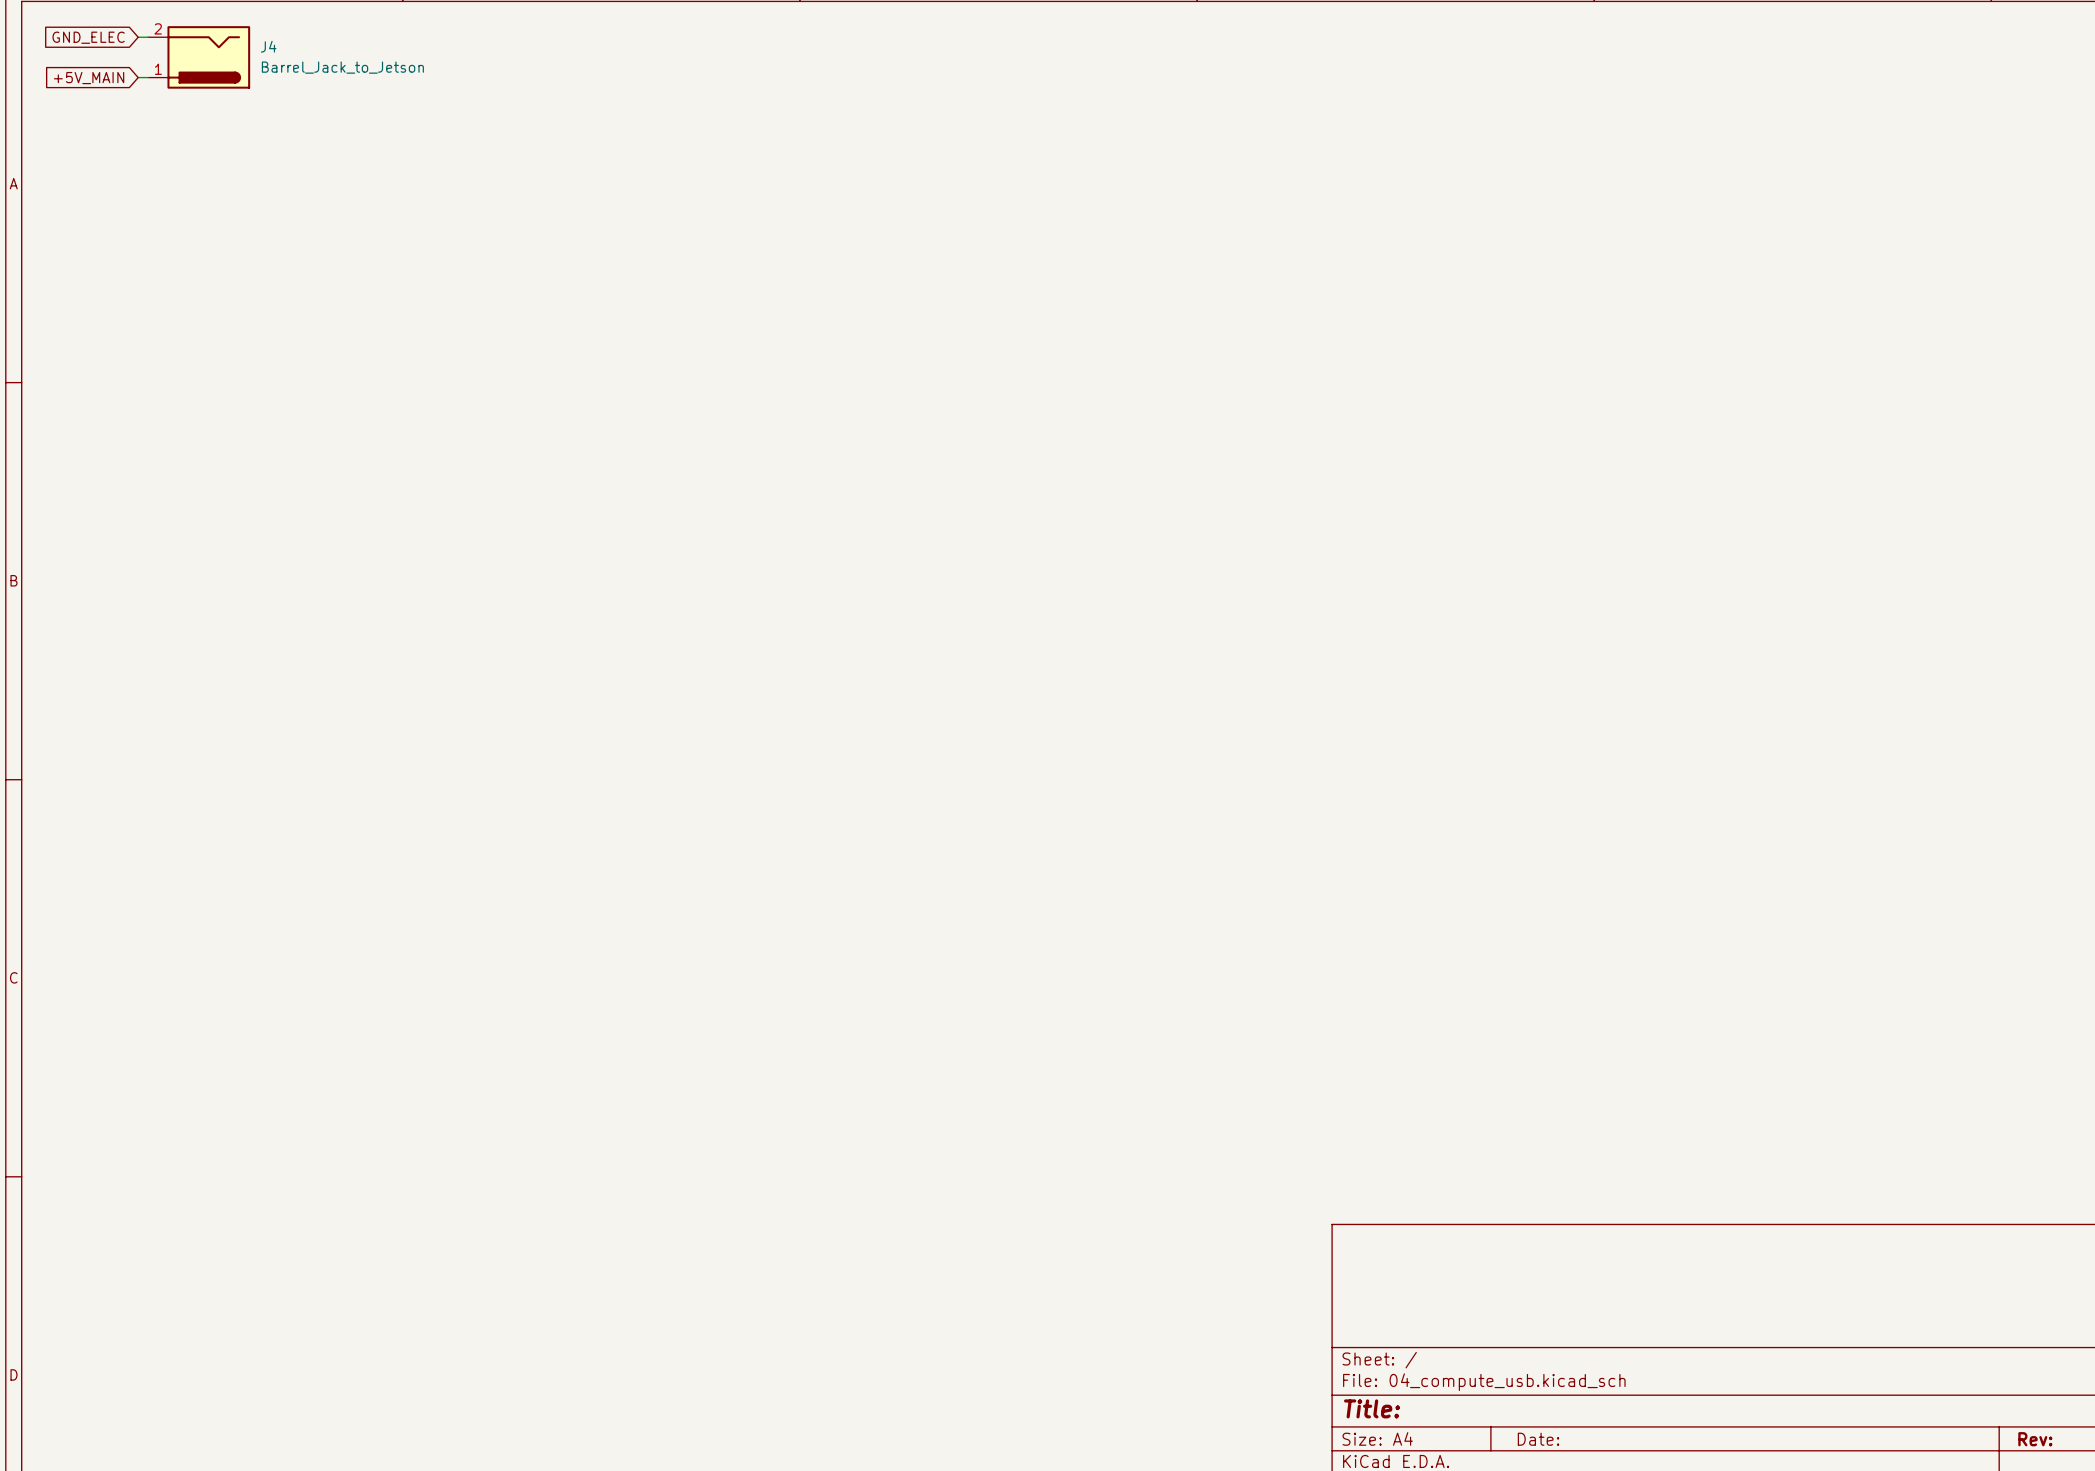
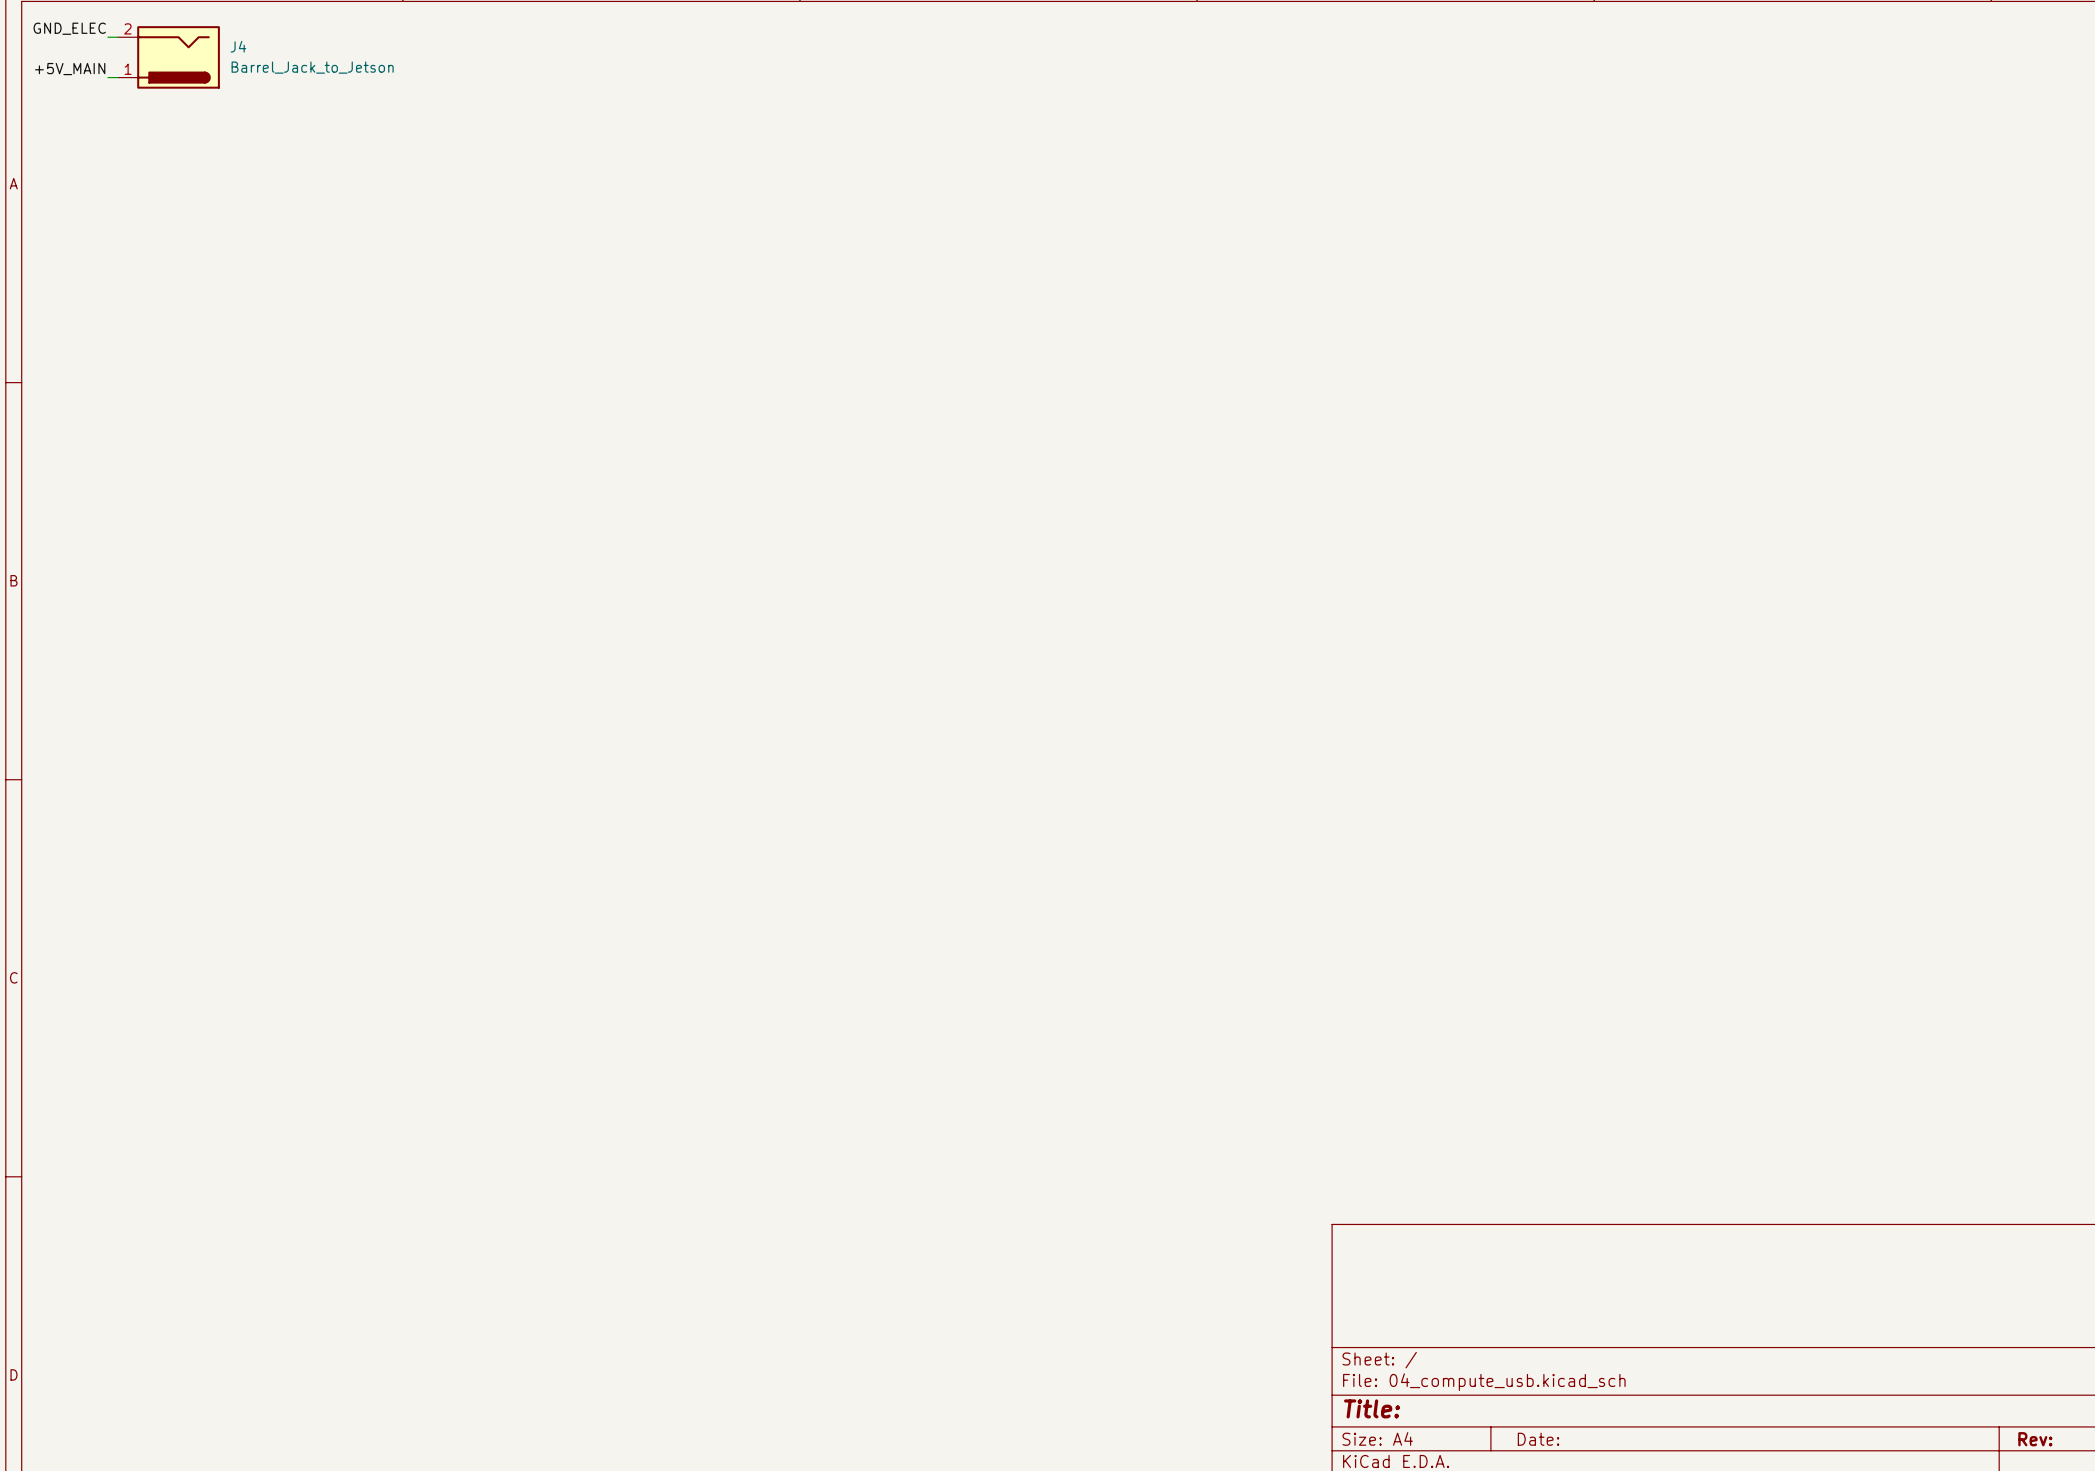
label: none -> GND_ELEC (69, 28)
global label: GND_ELEC (88, 37) -> none
J4 position: (199, 57) -> (168, 57)
label: none -> +5V_MAIN (70, 69)
global label: +5V_MAIN (89, 78) -> none

